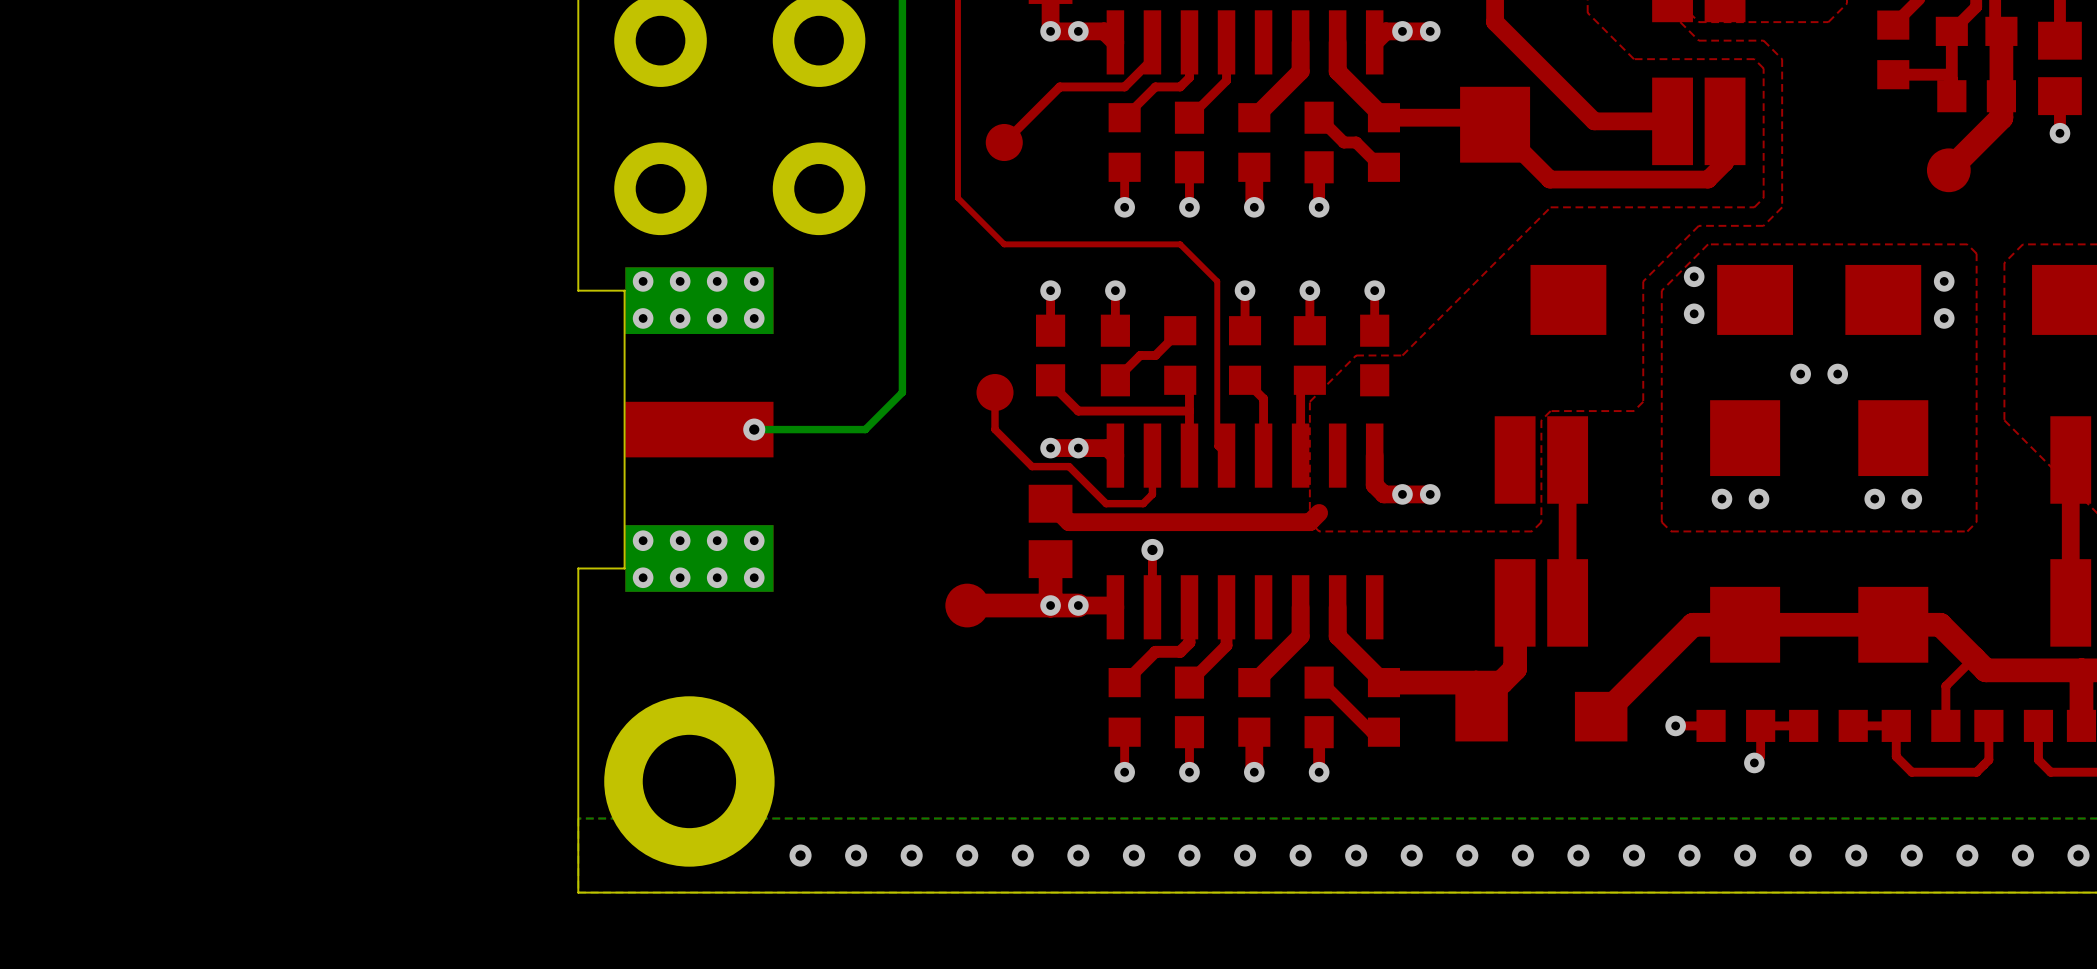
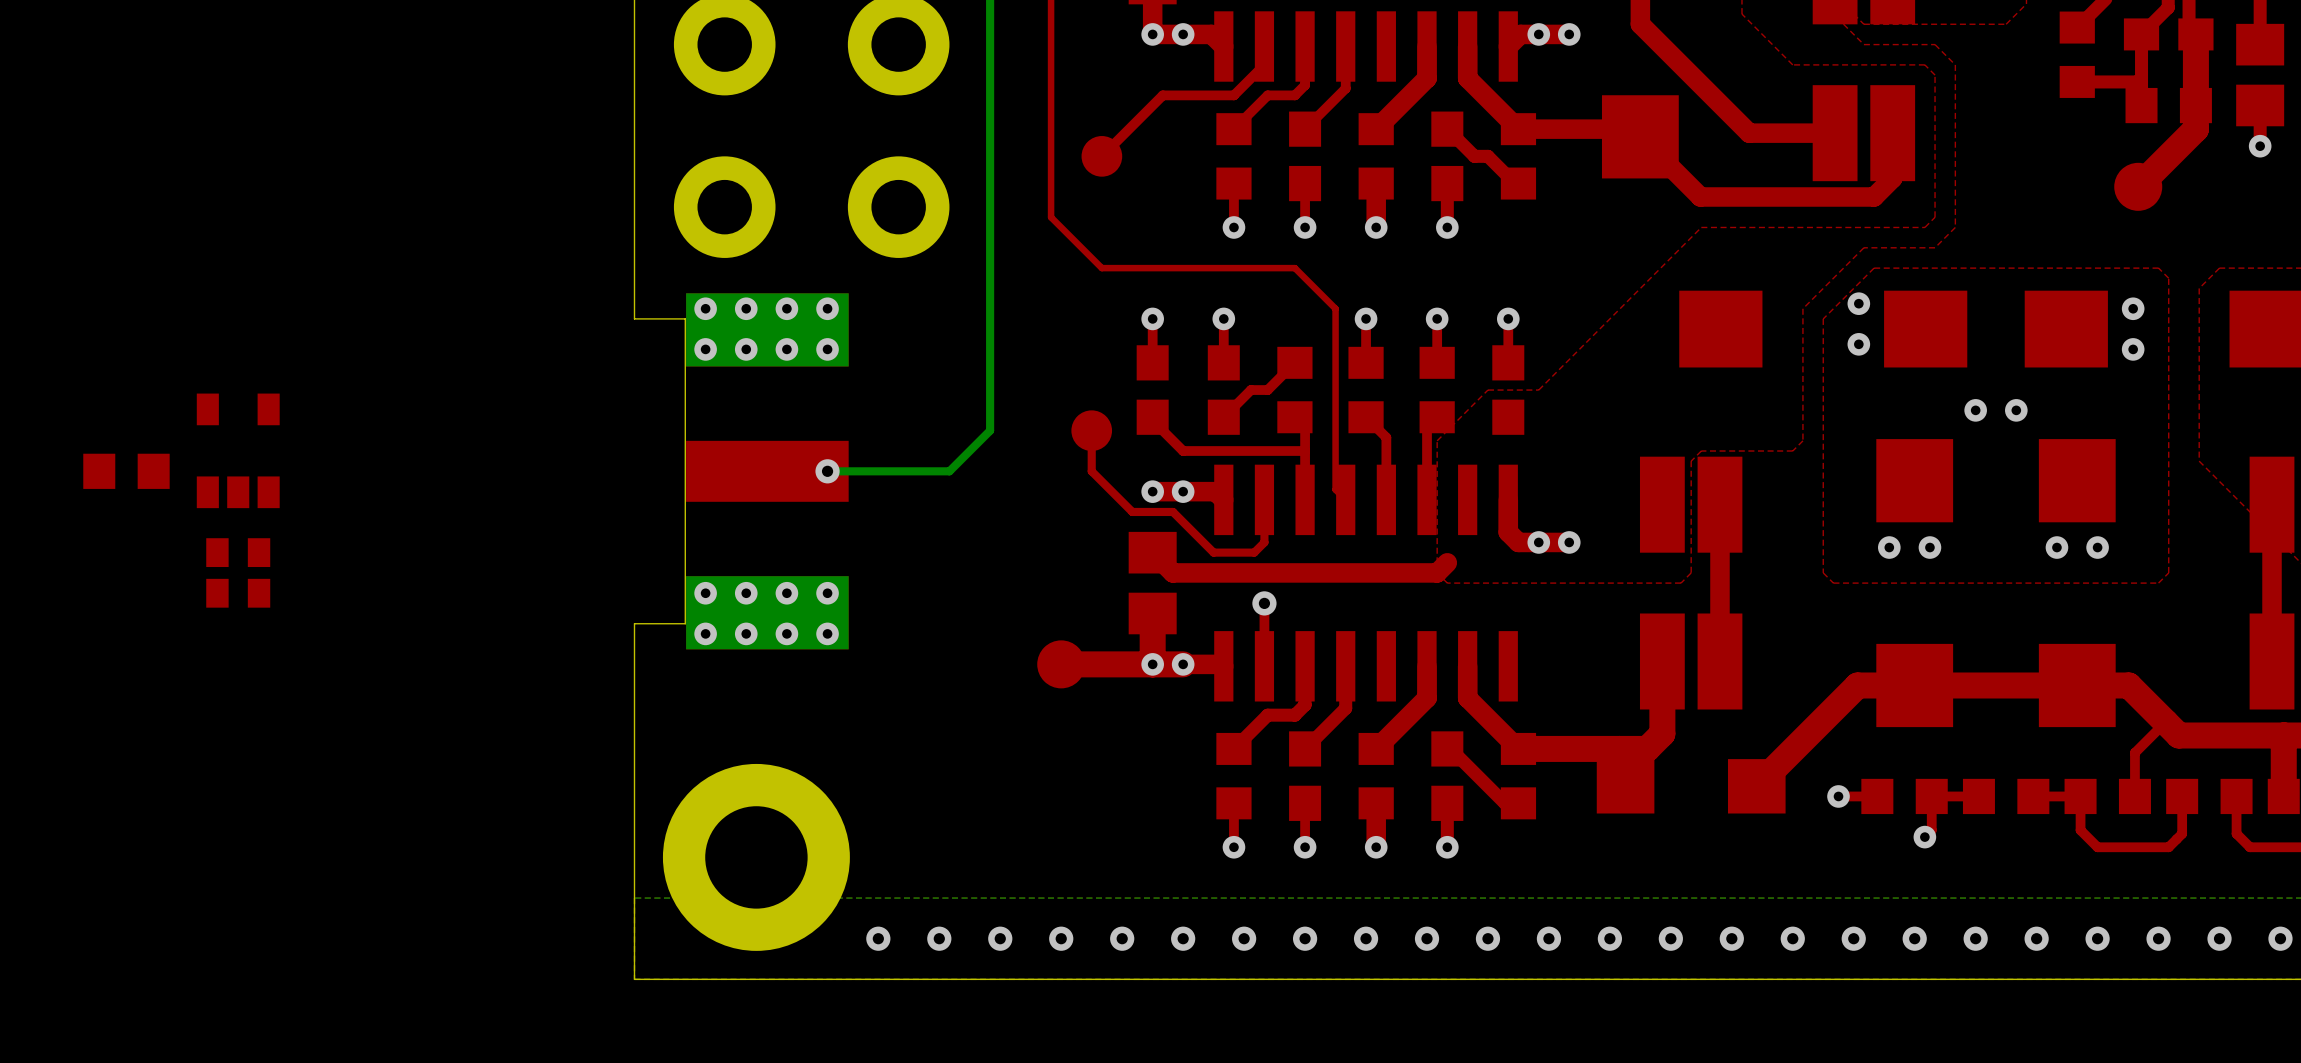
part: none -> (238, 450)
part: none -> (126, 471)
part: none -> (238, 552)
part: none -> (238, 593)

